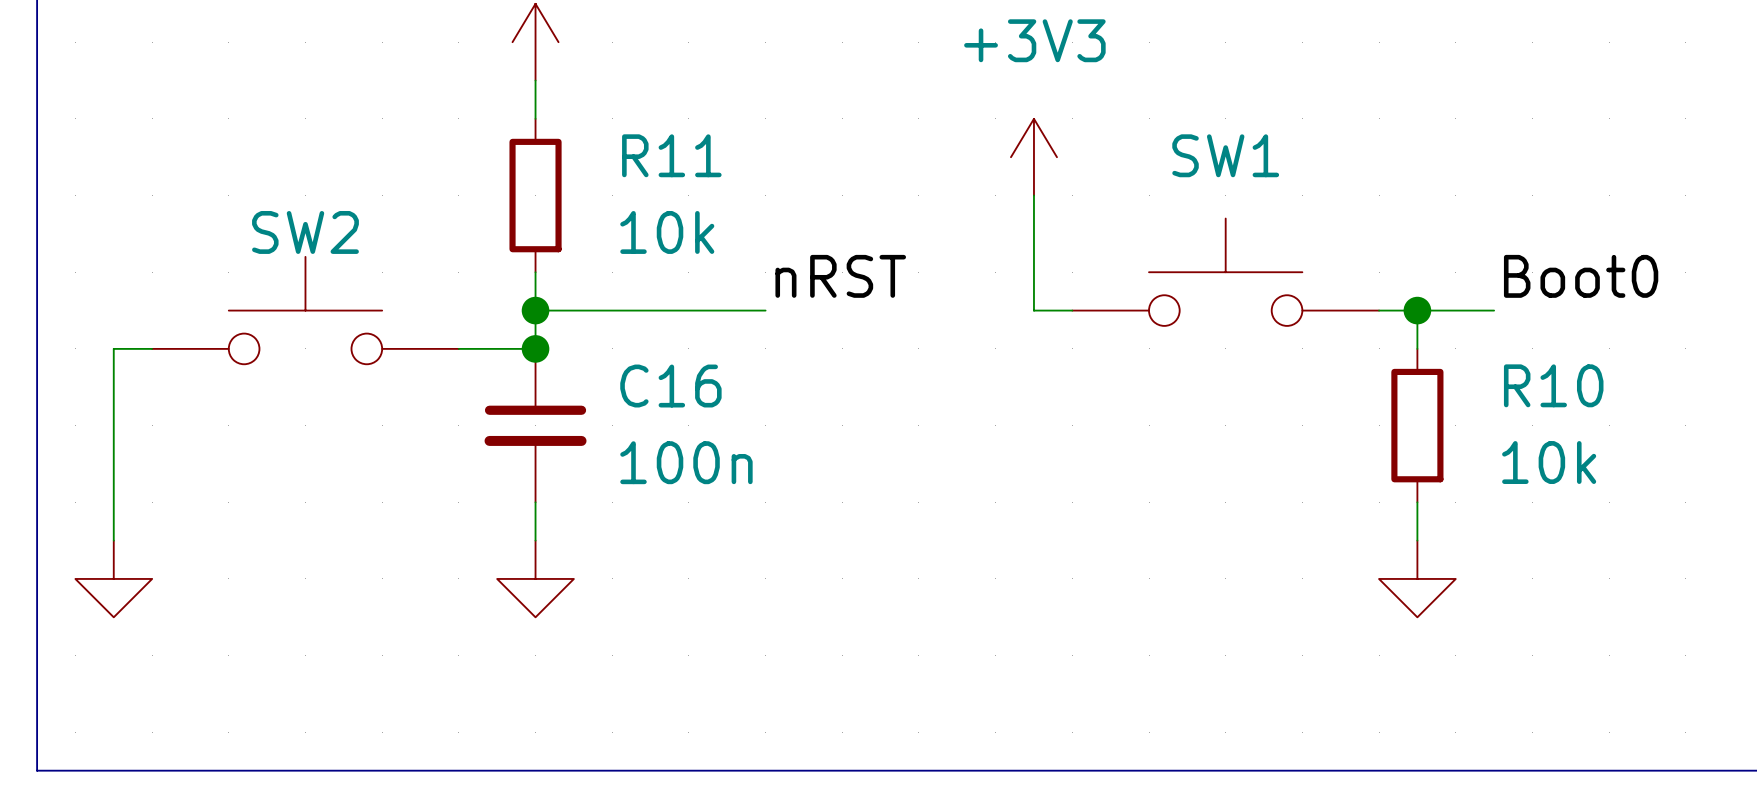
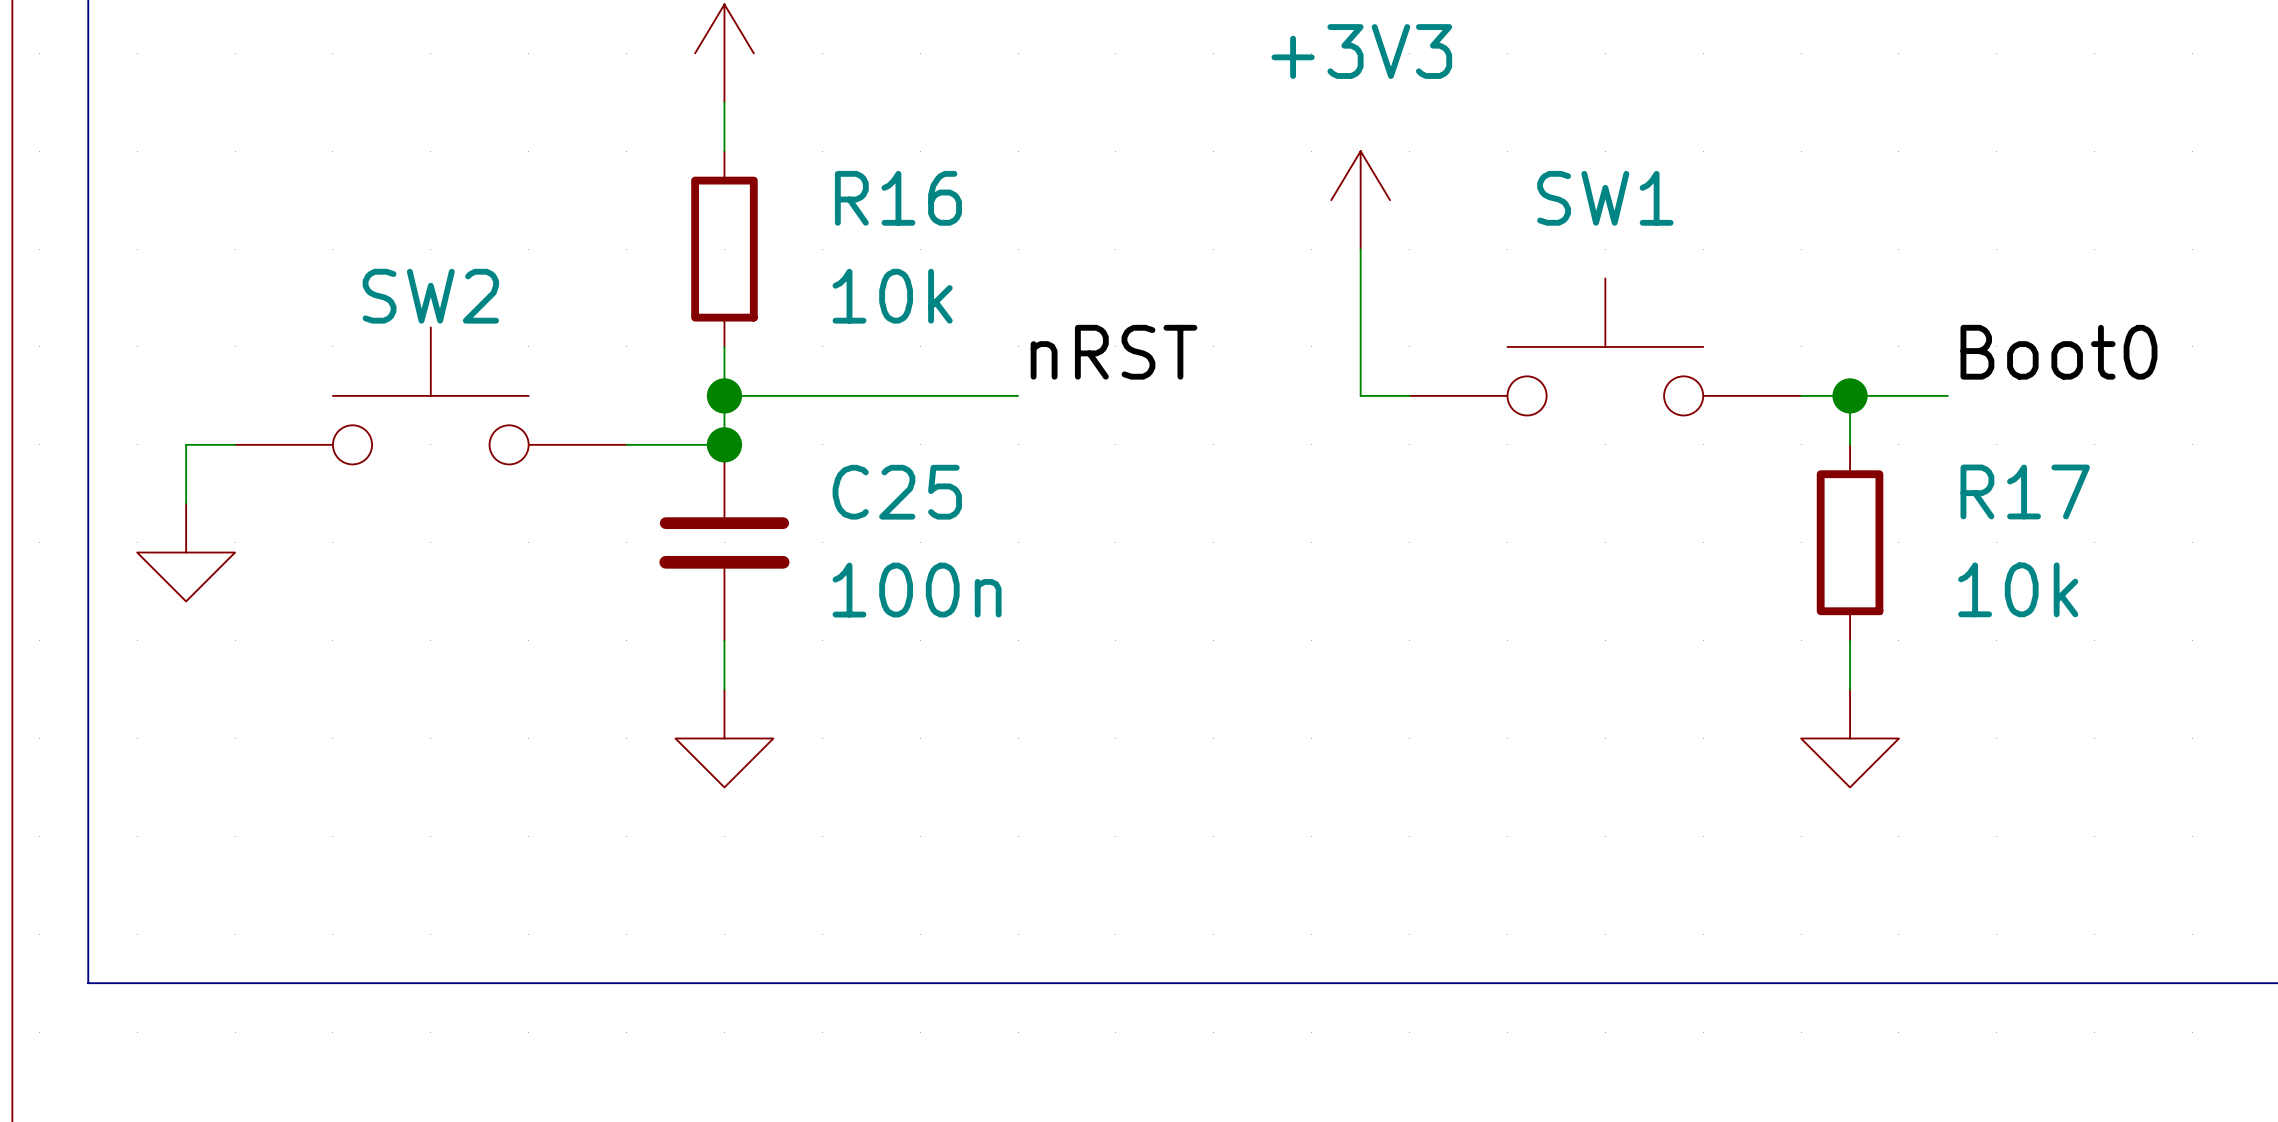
R11 name: R11 (671, 155) -> R16 (898, 198)
R10 name: R10 (1553, 385) -> R17 (2025, 491)
C16 name: C16 (670, 386) -> C25 (897, 492)
wire: (113, 394) (113, 540) -> none
power symbol position: (113, 578) -> (186, 552)

